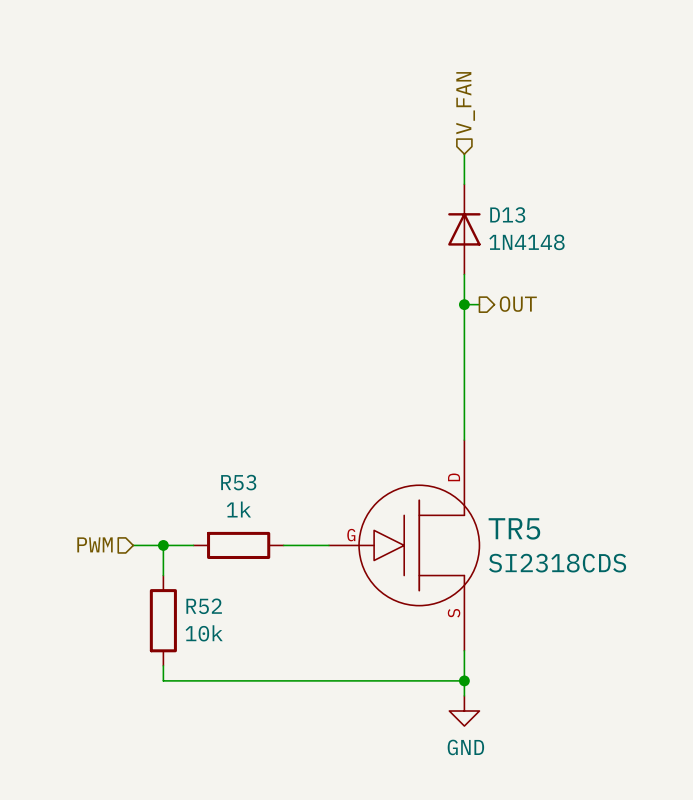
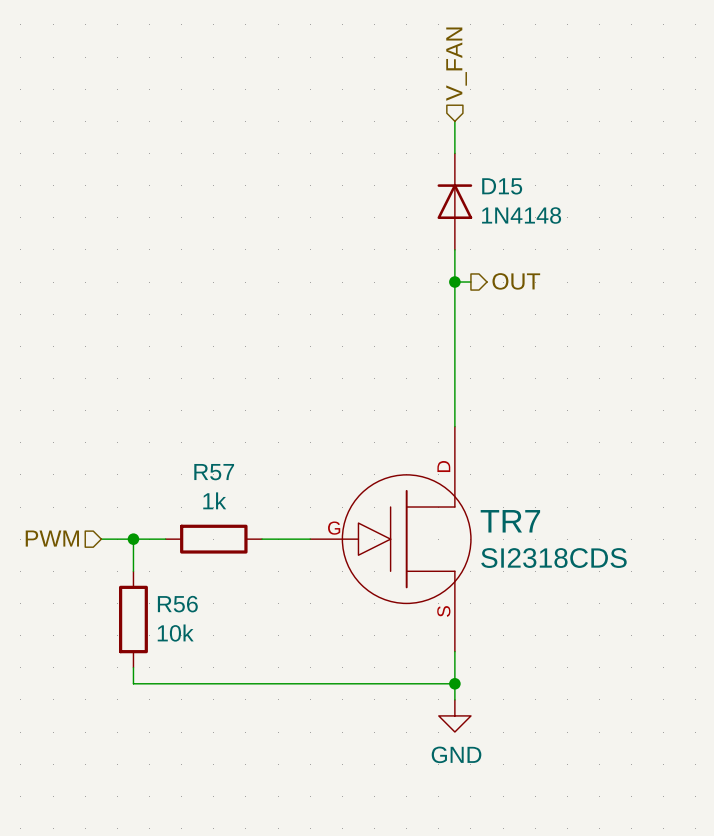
D13 name: D13 (507, 214) -> D15 (502, 186)
R53 name: R53 (238, 482) -> R57 (214, 472)
TR5 name: TR5 (514, 528) -> TR7 (510, 521)
R52 name: R52 (204, 606) -> R56 (177, 604)

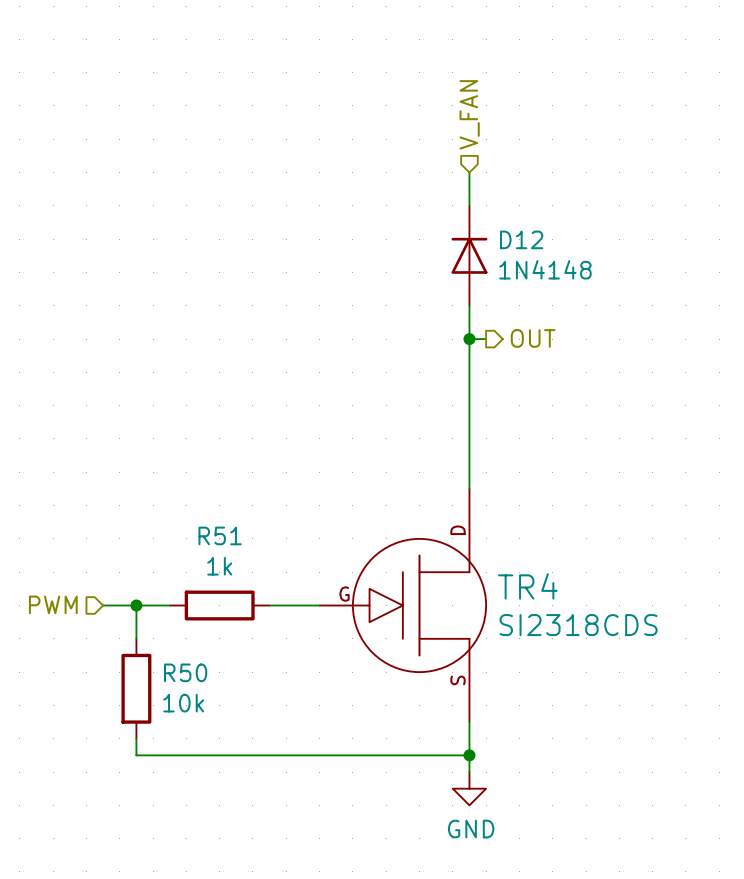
D15 name: D15 (502, 186) -> D12 (521, 239)
R57 name: R57 (214, 472) -> R51 (220, 535)
TR7 name: TR7 (510, 521) -> TR4 (527, 586)
R56 name: R56 (177, 604) -> R50 (185, 672)

